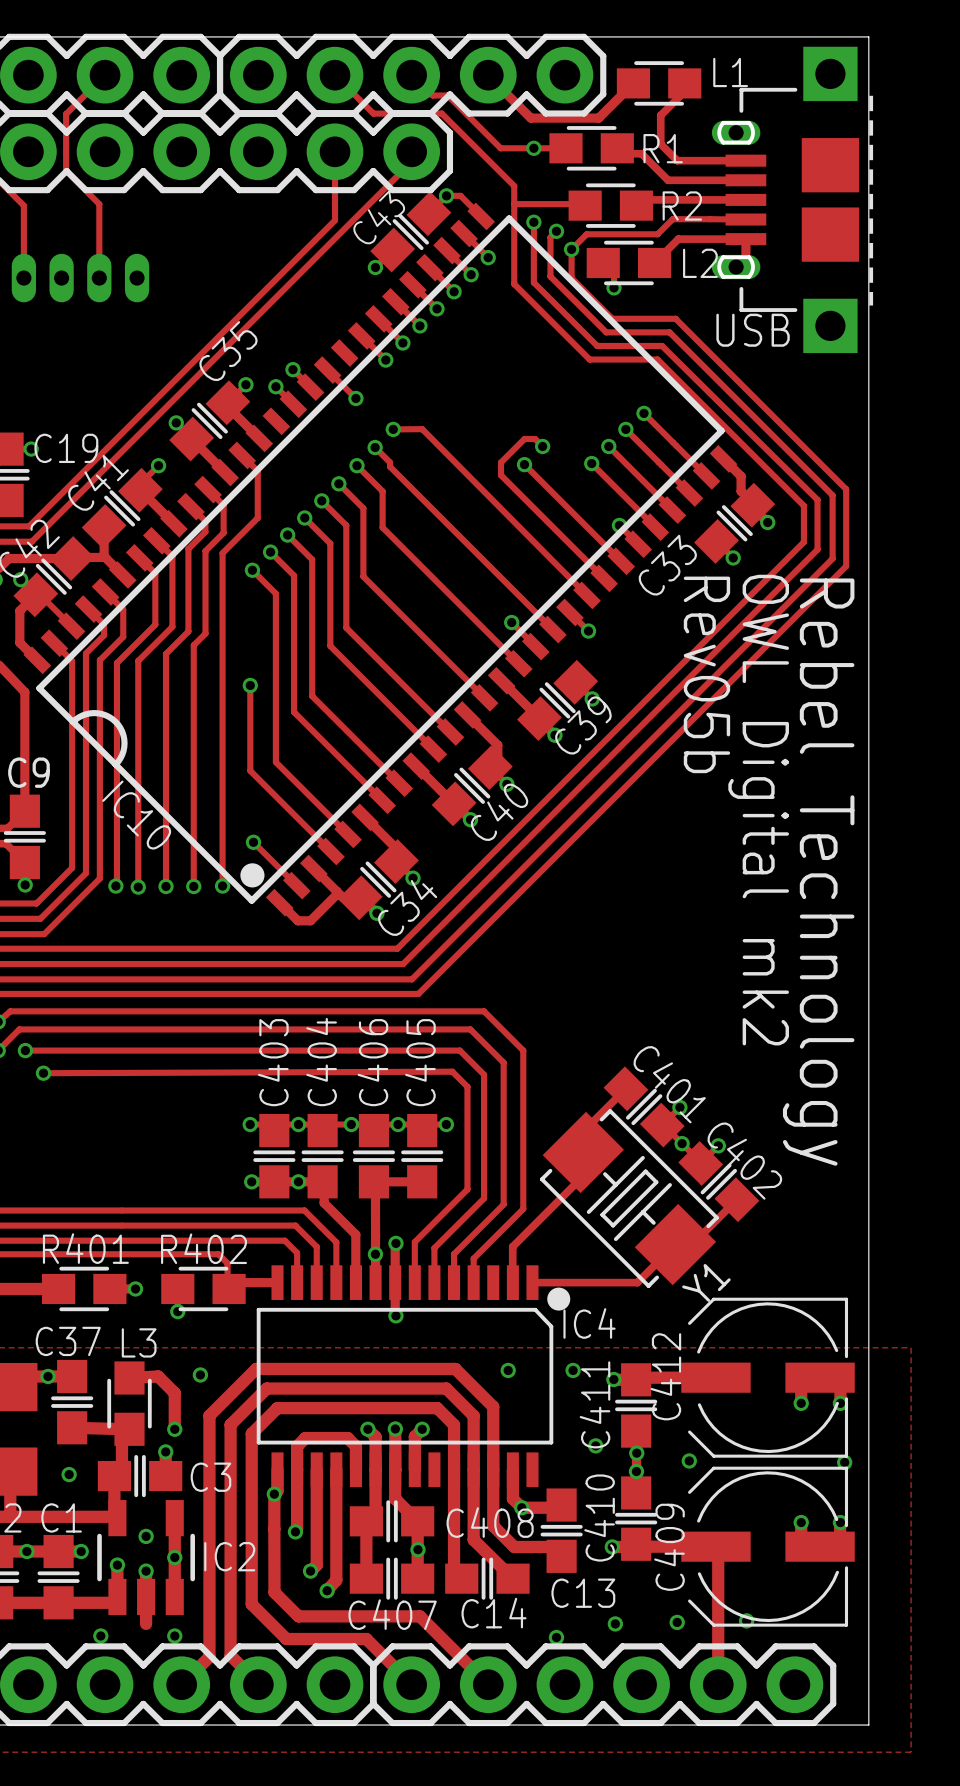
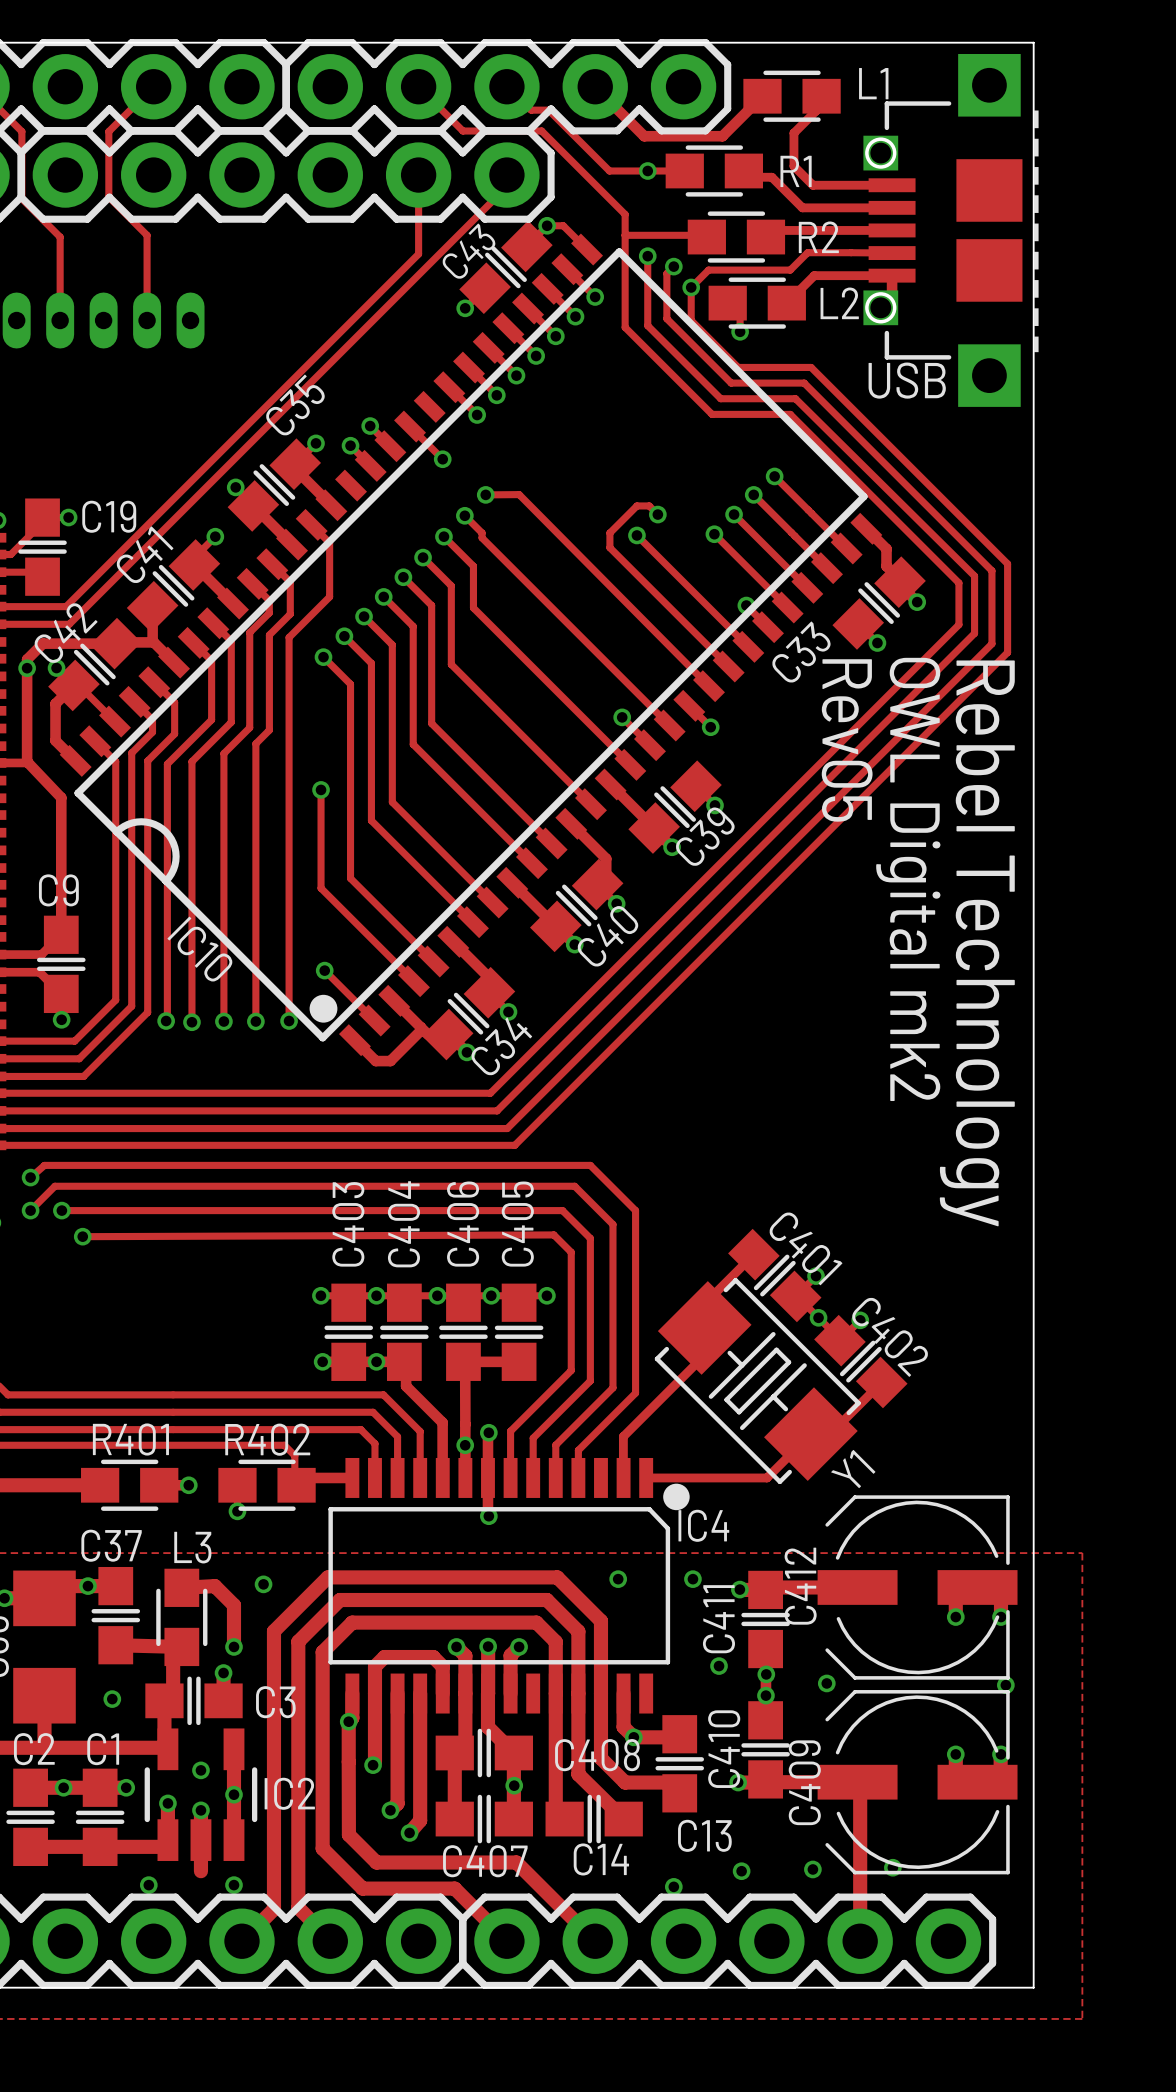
USB footprint: [711, 46, 874, 354] -> [863, 54, 1039, 407]
text: Rev05b (706, 674) -> Rev05 (847, 740)

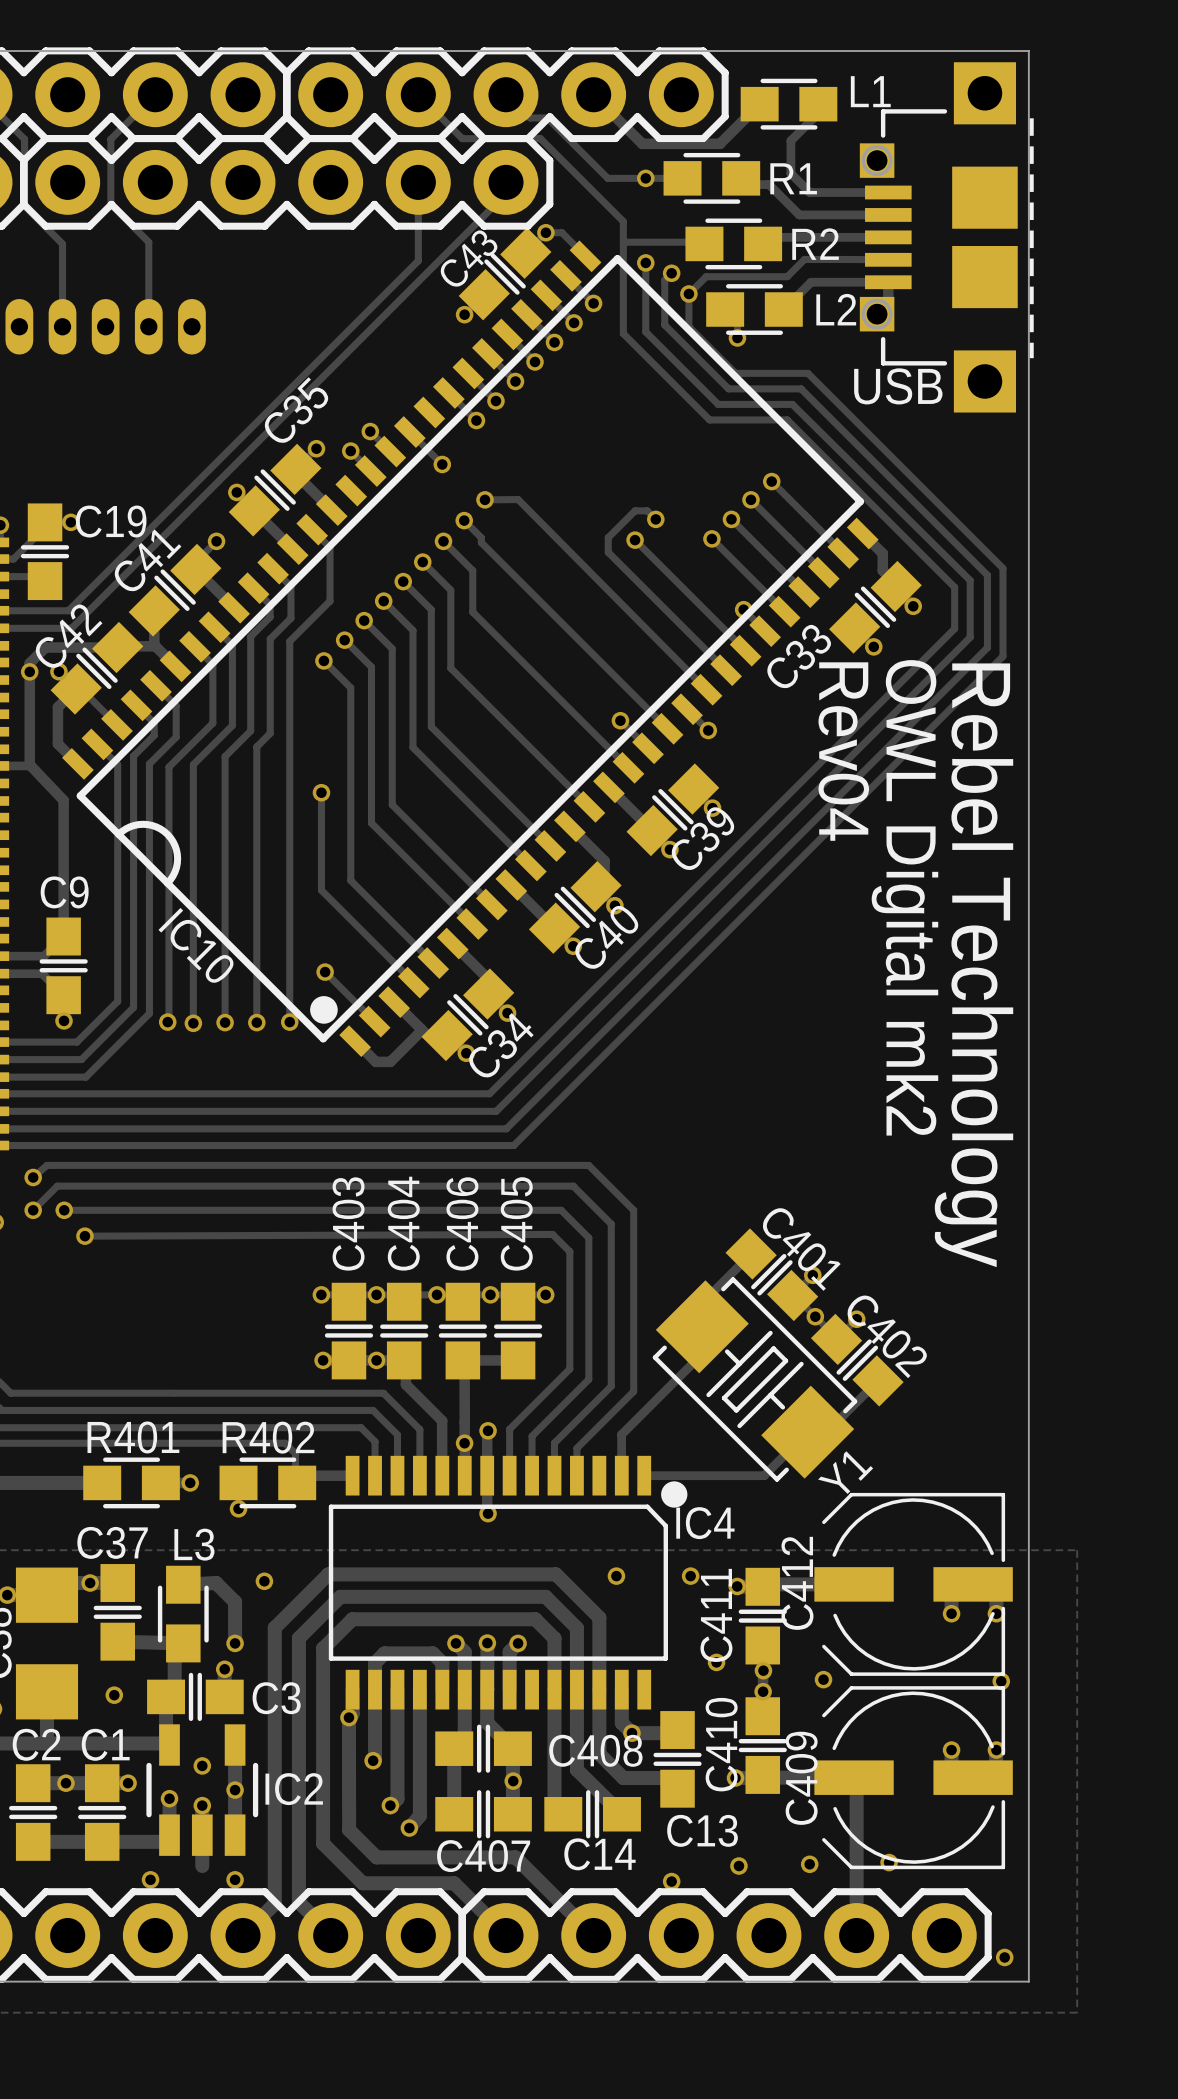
text: Rev05 (847, 740) -> Rev04 (843, 751)
via: none -> (1004, 1957)

